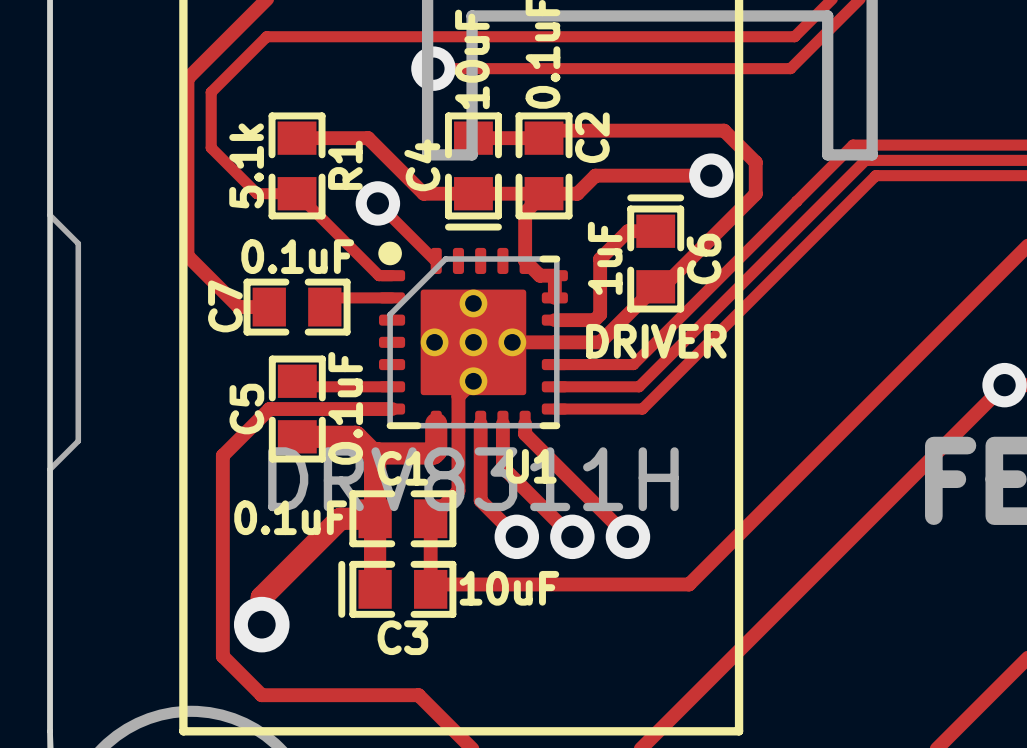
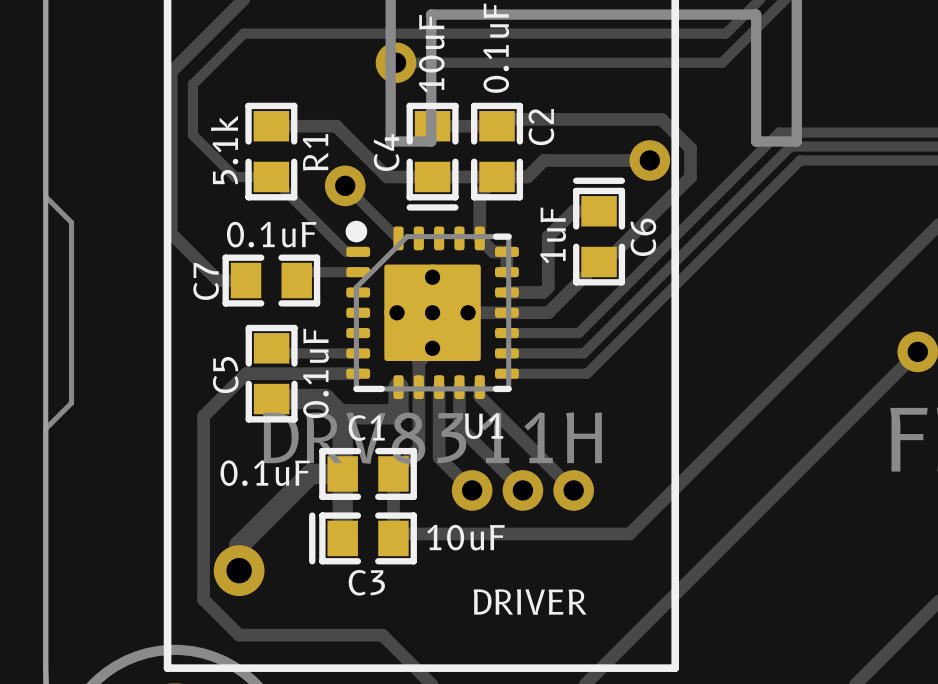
text position: DRIVER (656, 341) -> DRIVER (530, 602)

